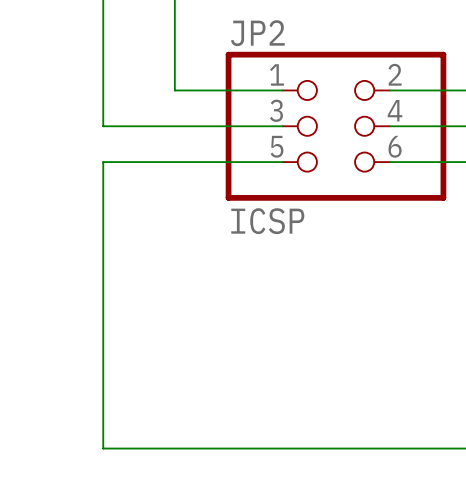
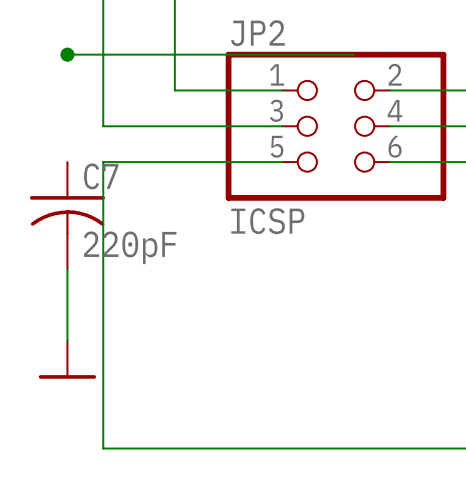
wire: none -> (67, 54) (353, 54)
junction: none -> (67, 54)
C7: none -> 220pF (67, 215)
wire: none -> (67, 269) (67, 341)
power symbol: none -> (67, 359)

